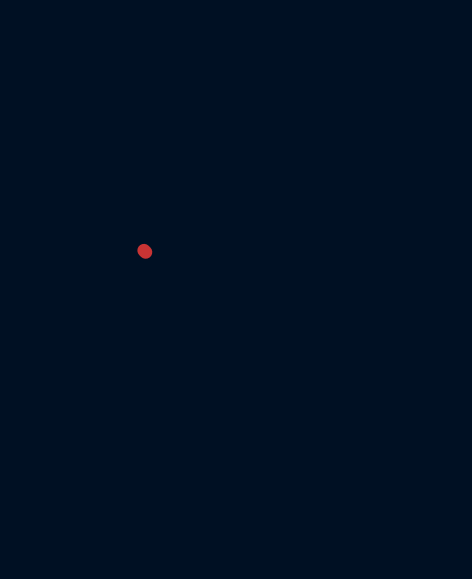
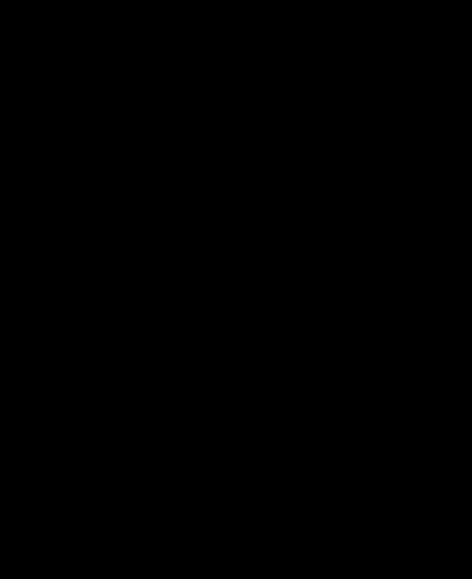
track: (143, 250) (145, 252) -> none

